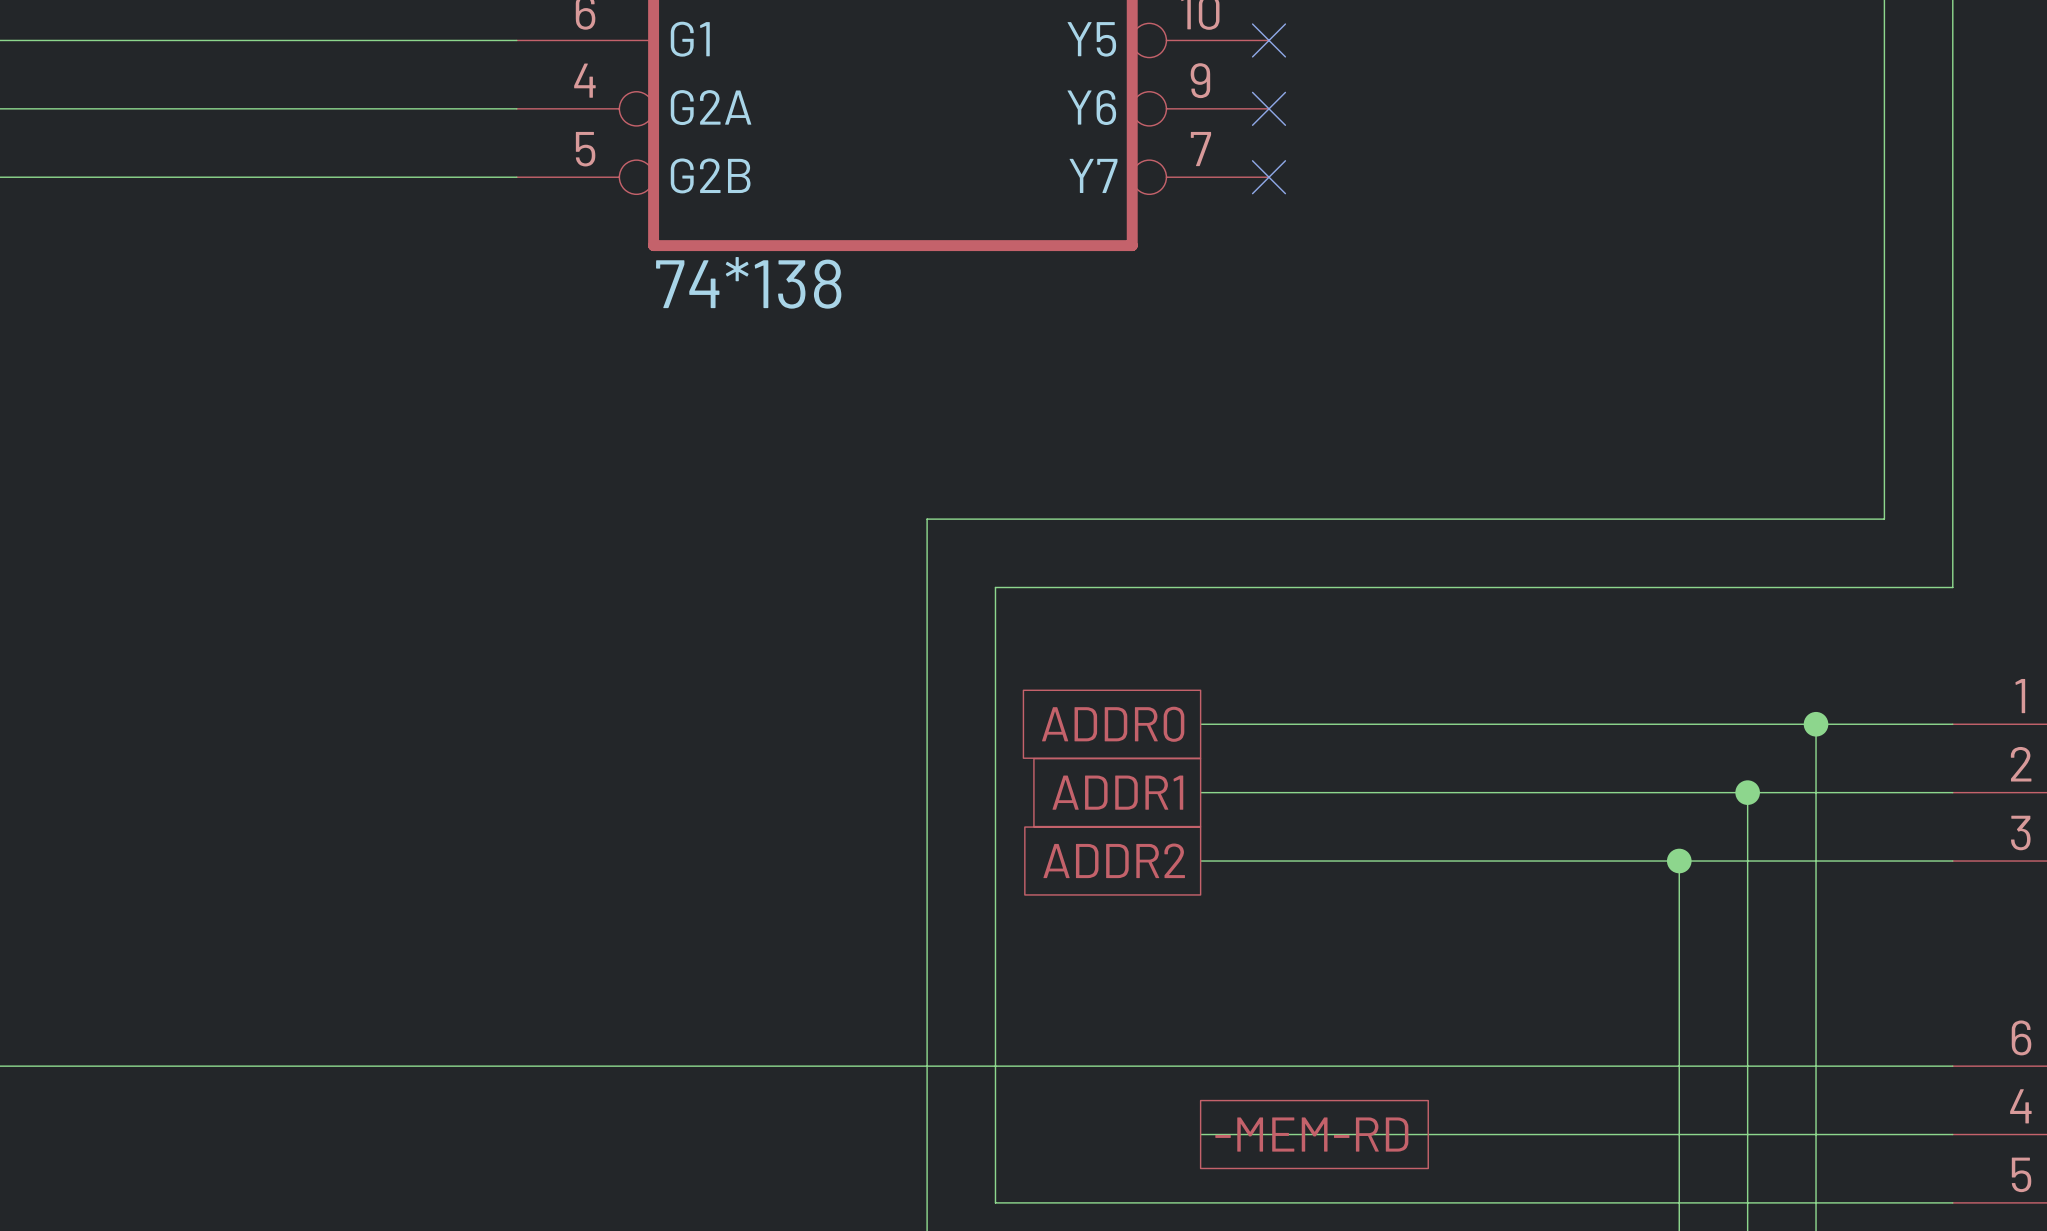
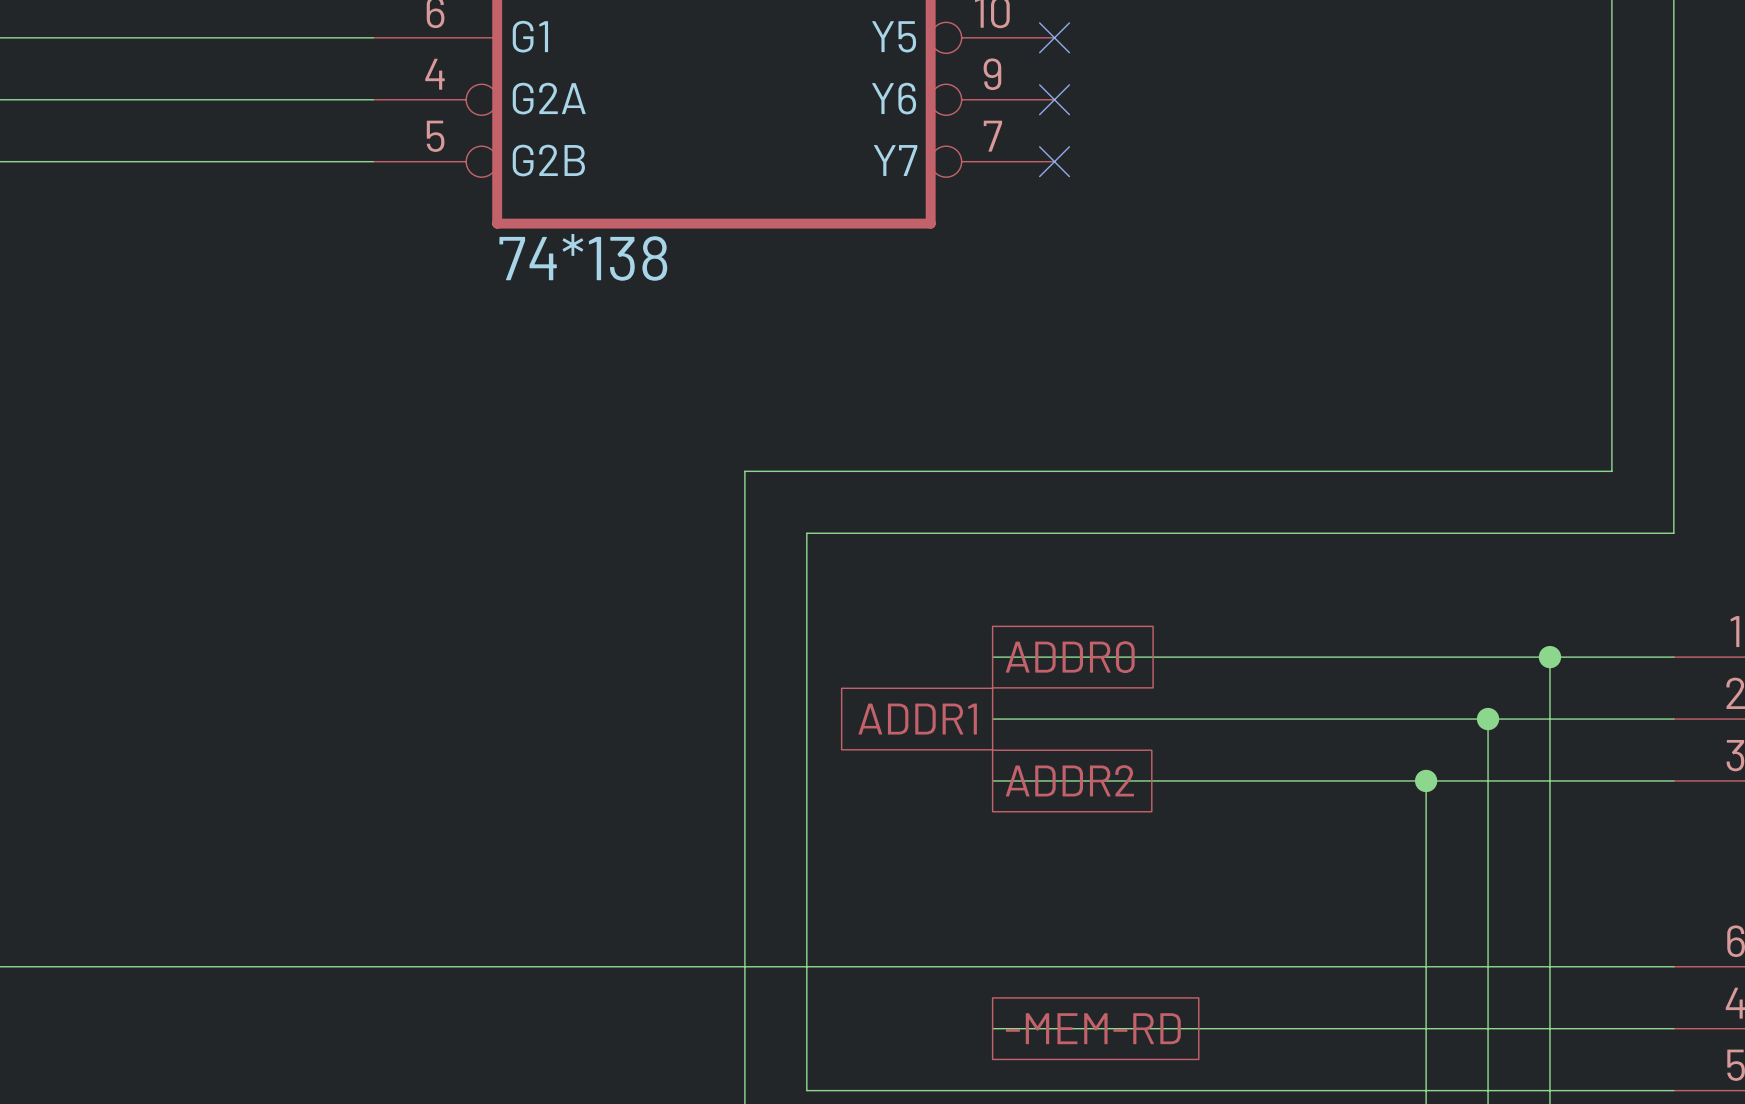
global label rotation: 0° (1113, 724) -> 180° (1070, 657)
global label position: ADDR0 (1113, 724) -> ADDR0 (1070, 657)
global label rotation: 0° (1114, 860) -> 180° (1069, 780)
global label position: ADDR2 (1114, 860) -> ADDR2 (1069, 780)

